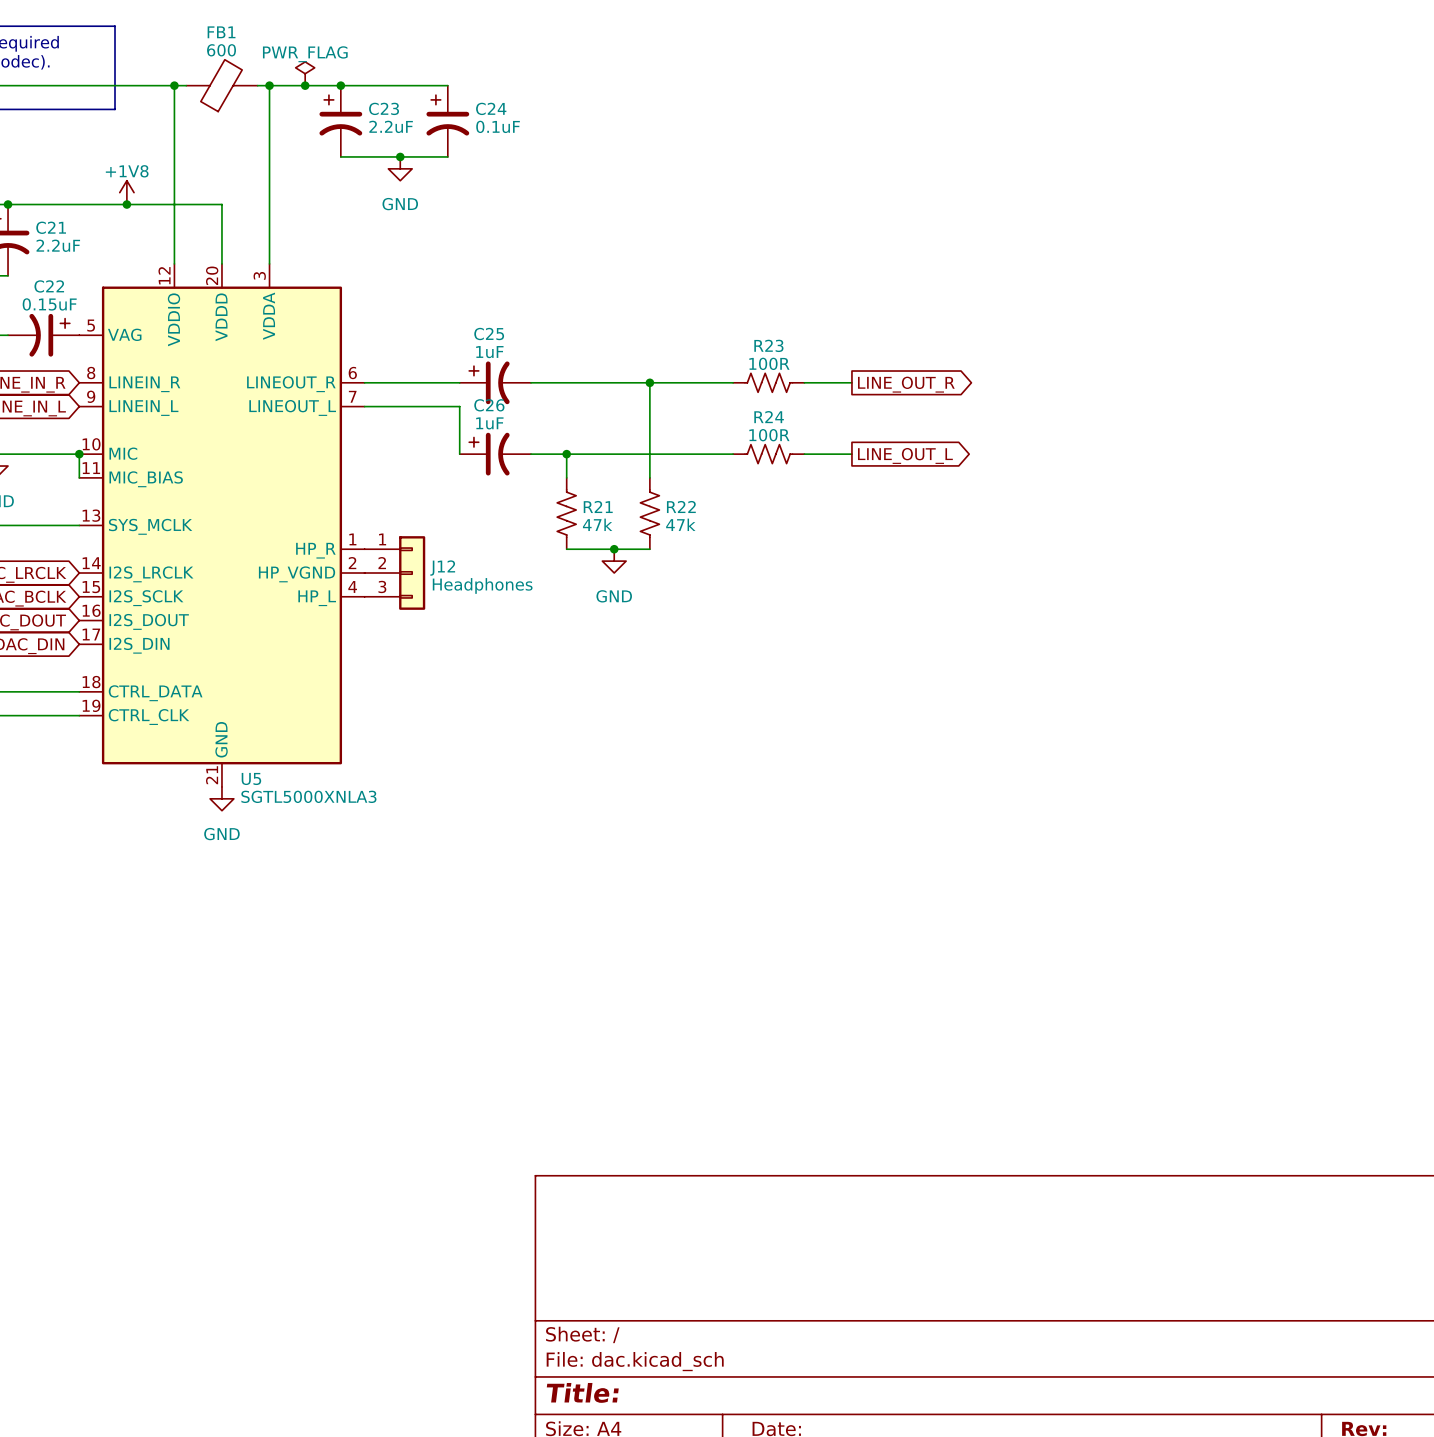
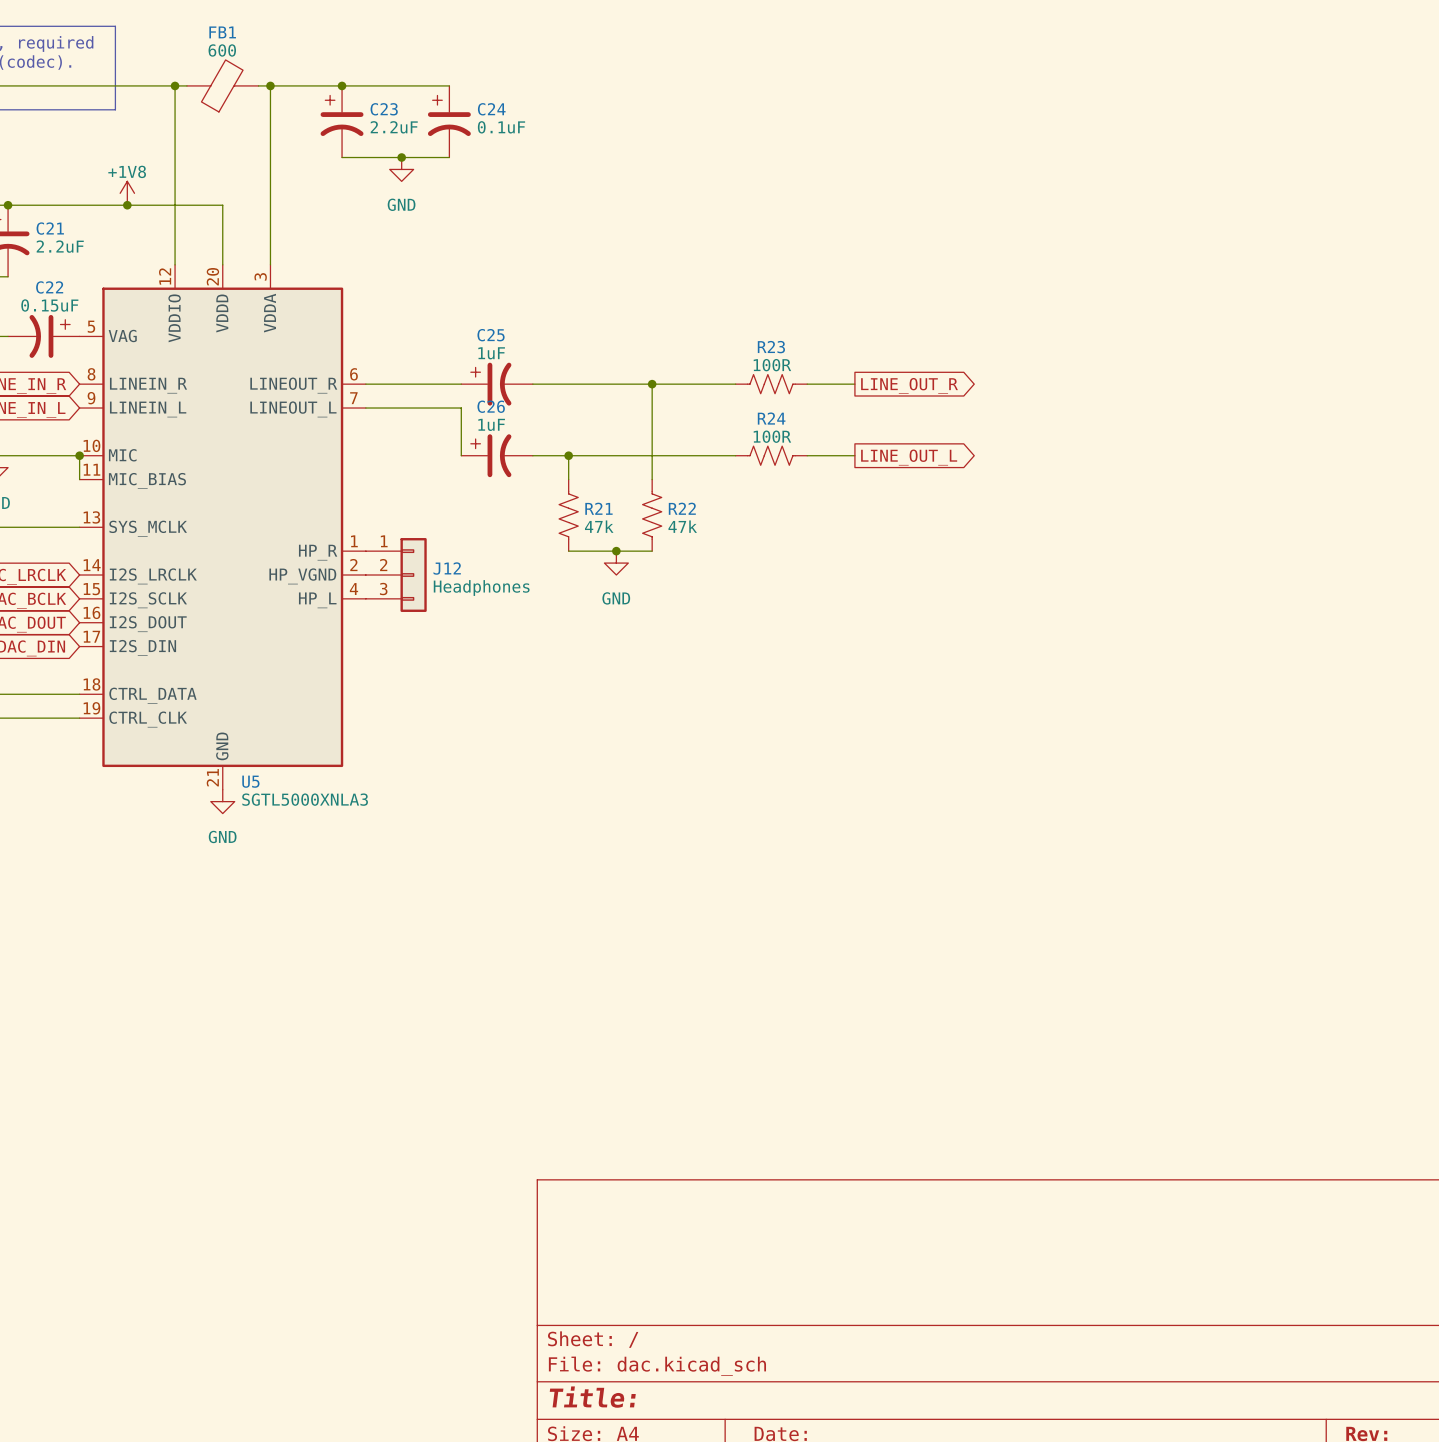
power symbol: PWR_FLAG (305, 73) -> none
junction: (305, 85) -> none

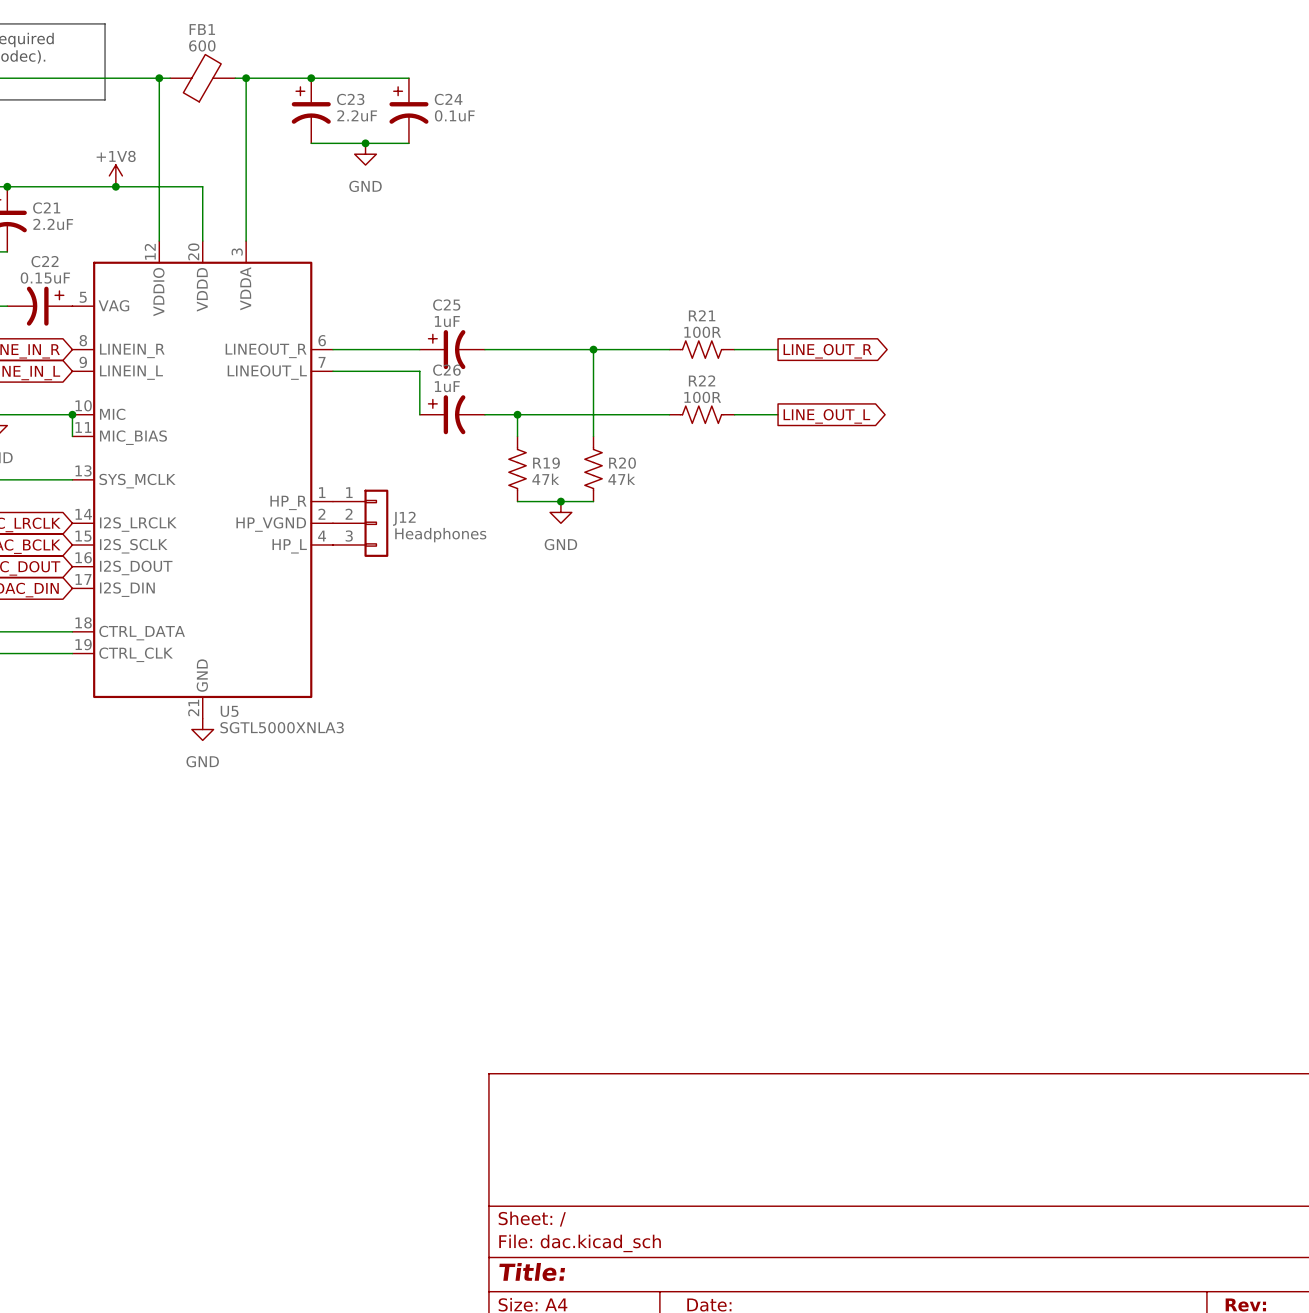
R23 name: R23 (771, 347) -> R21 (702, 315)
R24 name: R24 (771, 418) -> R22 (702, 380)
R21 name: R21 (598, 508) -> R19 (546, 463)
R22 name: R22 (682, 508) -> R20 (622, 463)

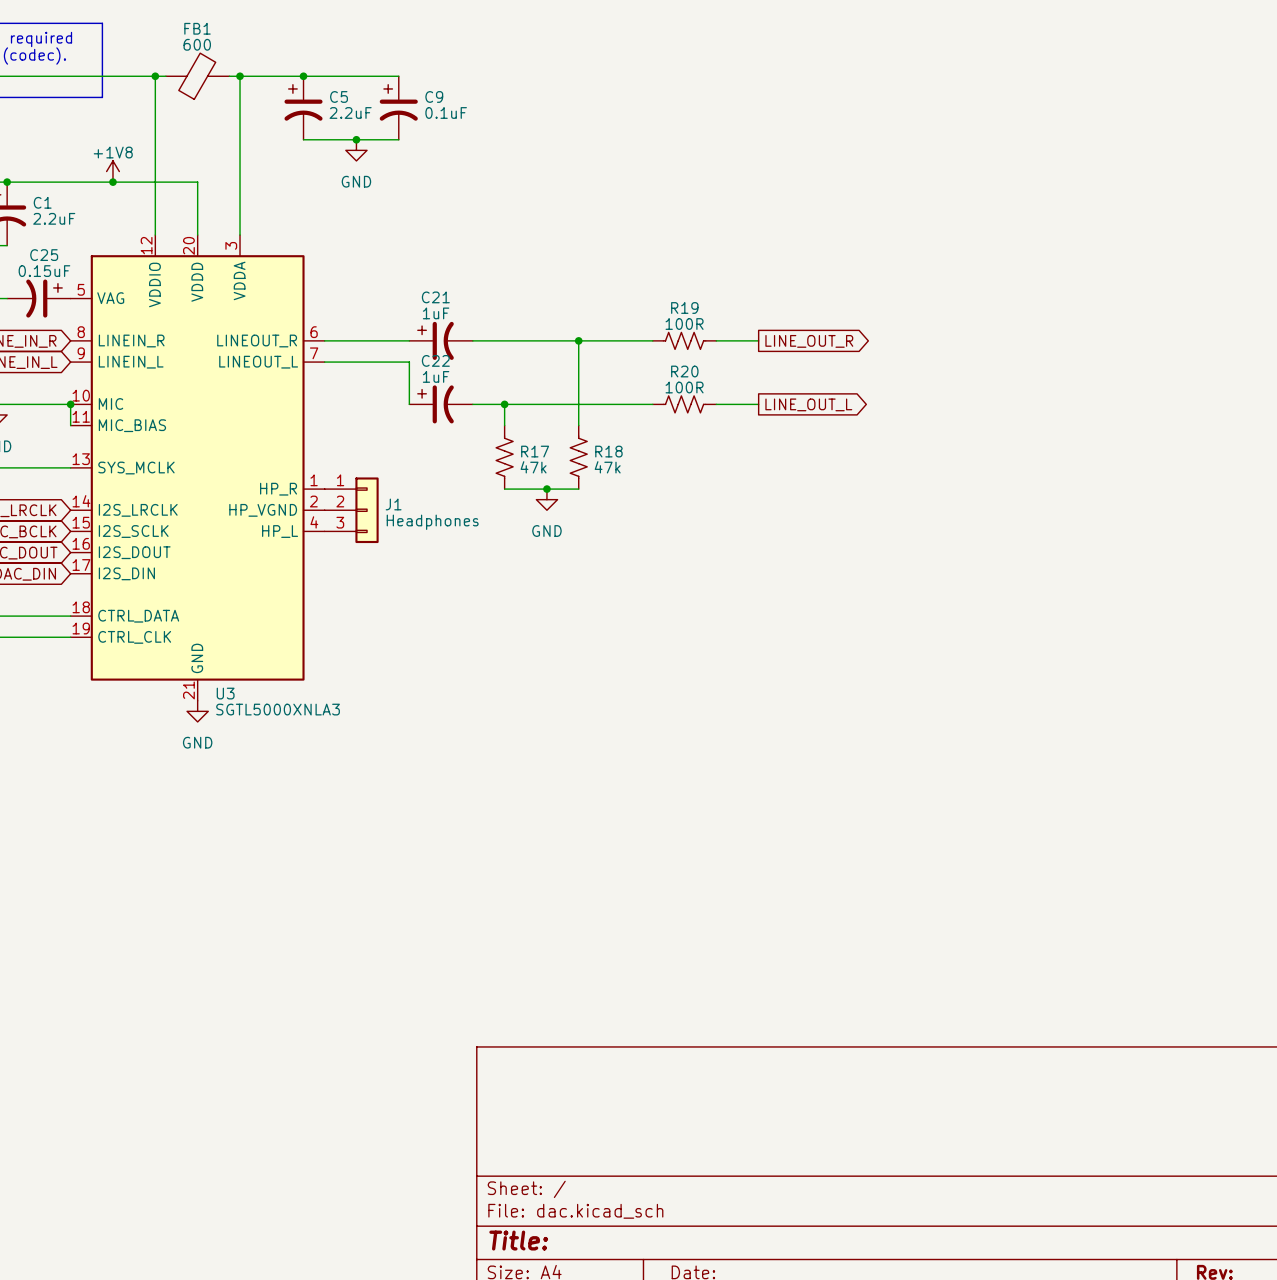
C23 name: C23 (350, 99) -> C5 (339, 96)
C24 name: C24 (448, 99) -> C9 (434, 96)
C21 name: C21 (46, 208) -> C1 (42, 202)
C22 name: C22 (44, 261) -> C25 (44, 255)
C25 name: C25 (446, 305) -> C21 (435, 297)
R21 name: R21 (702, 315) -> R19 (684, 307)
C26 name: C26 (446, 370) -> C22 (435, 360)
R22 name: R22 (702, 380) -> R20 (684, 371)
R19 name: R19 (546, 463) -> R17 (535, 451)
R20 name: R20 (622, 463) -> R18 (608, 451)
J12 name: J12 (404, 518) -> J1 (393, 504)
U5 name: U5 (229, 711) -> U3 (225, 693)

